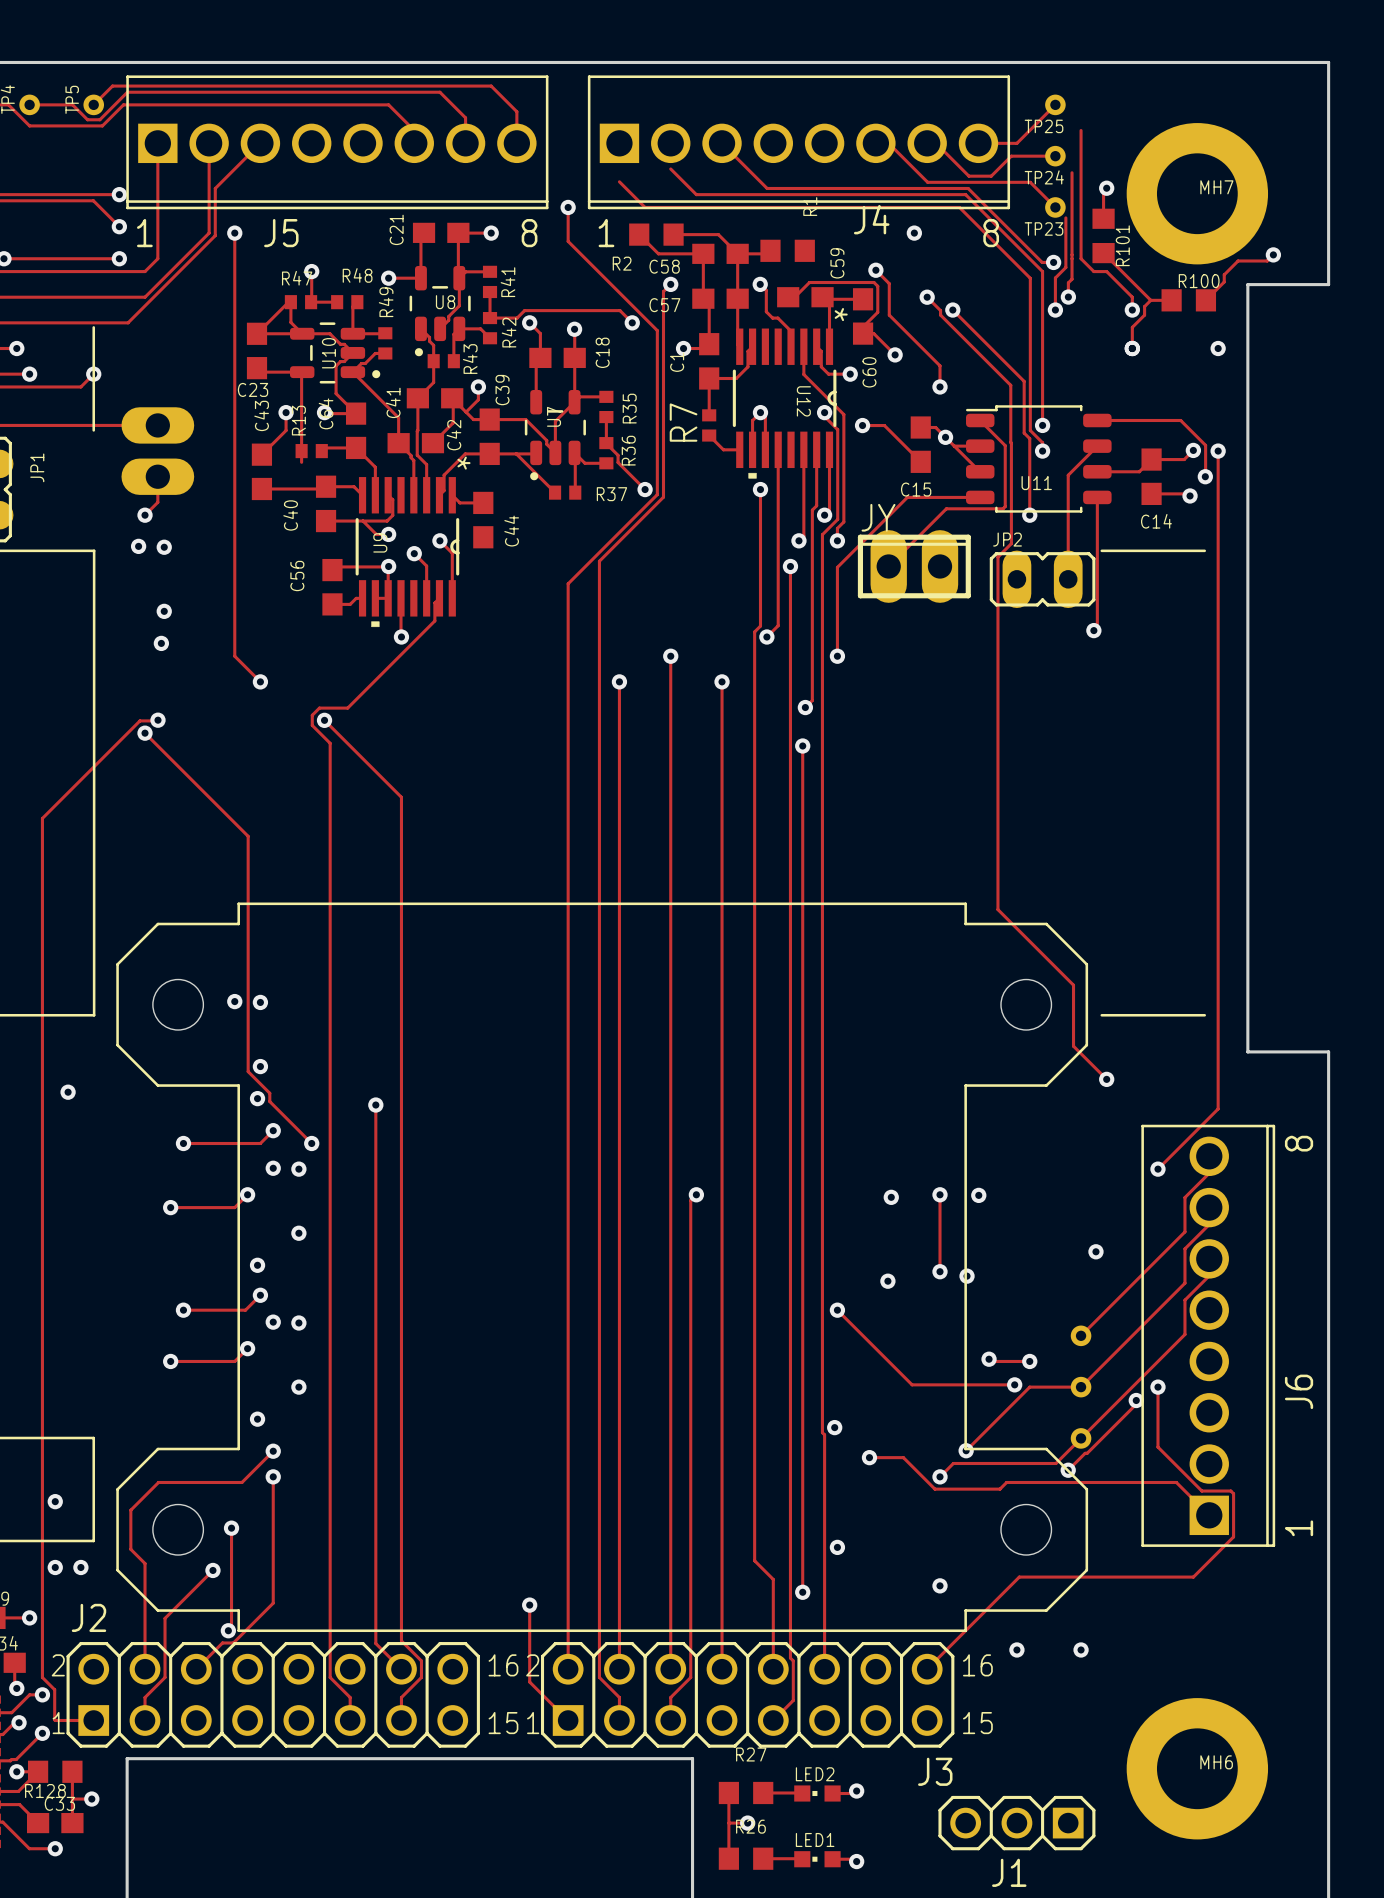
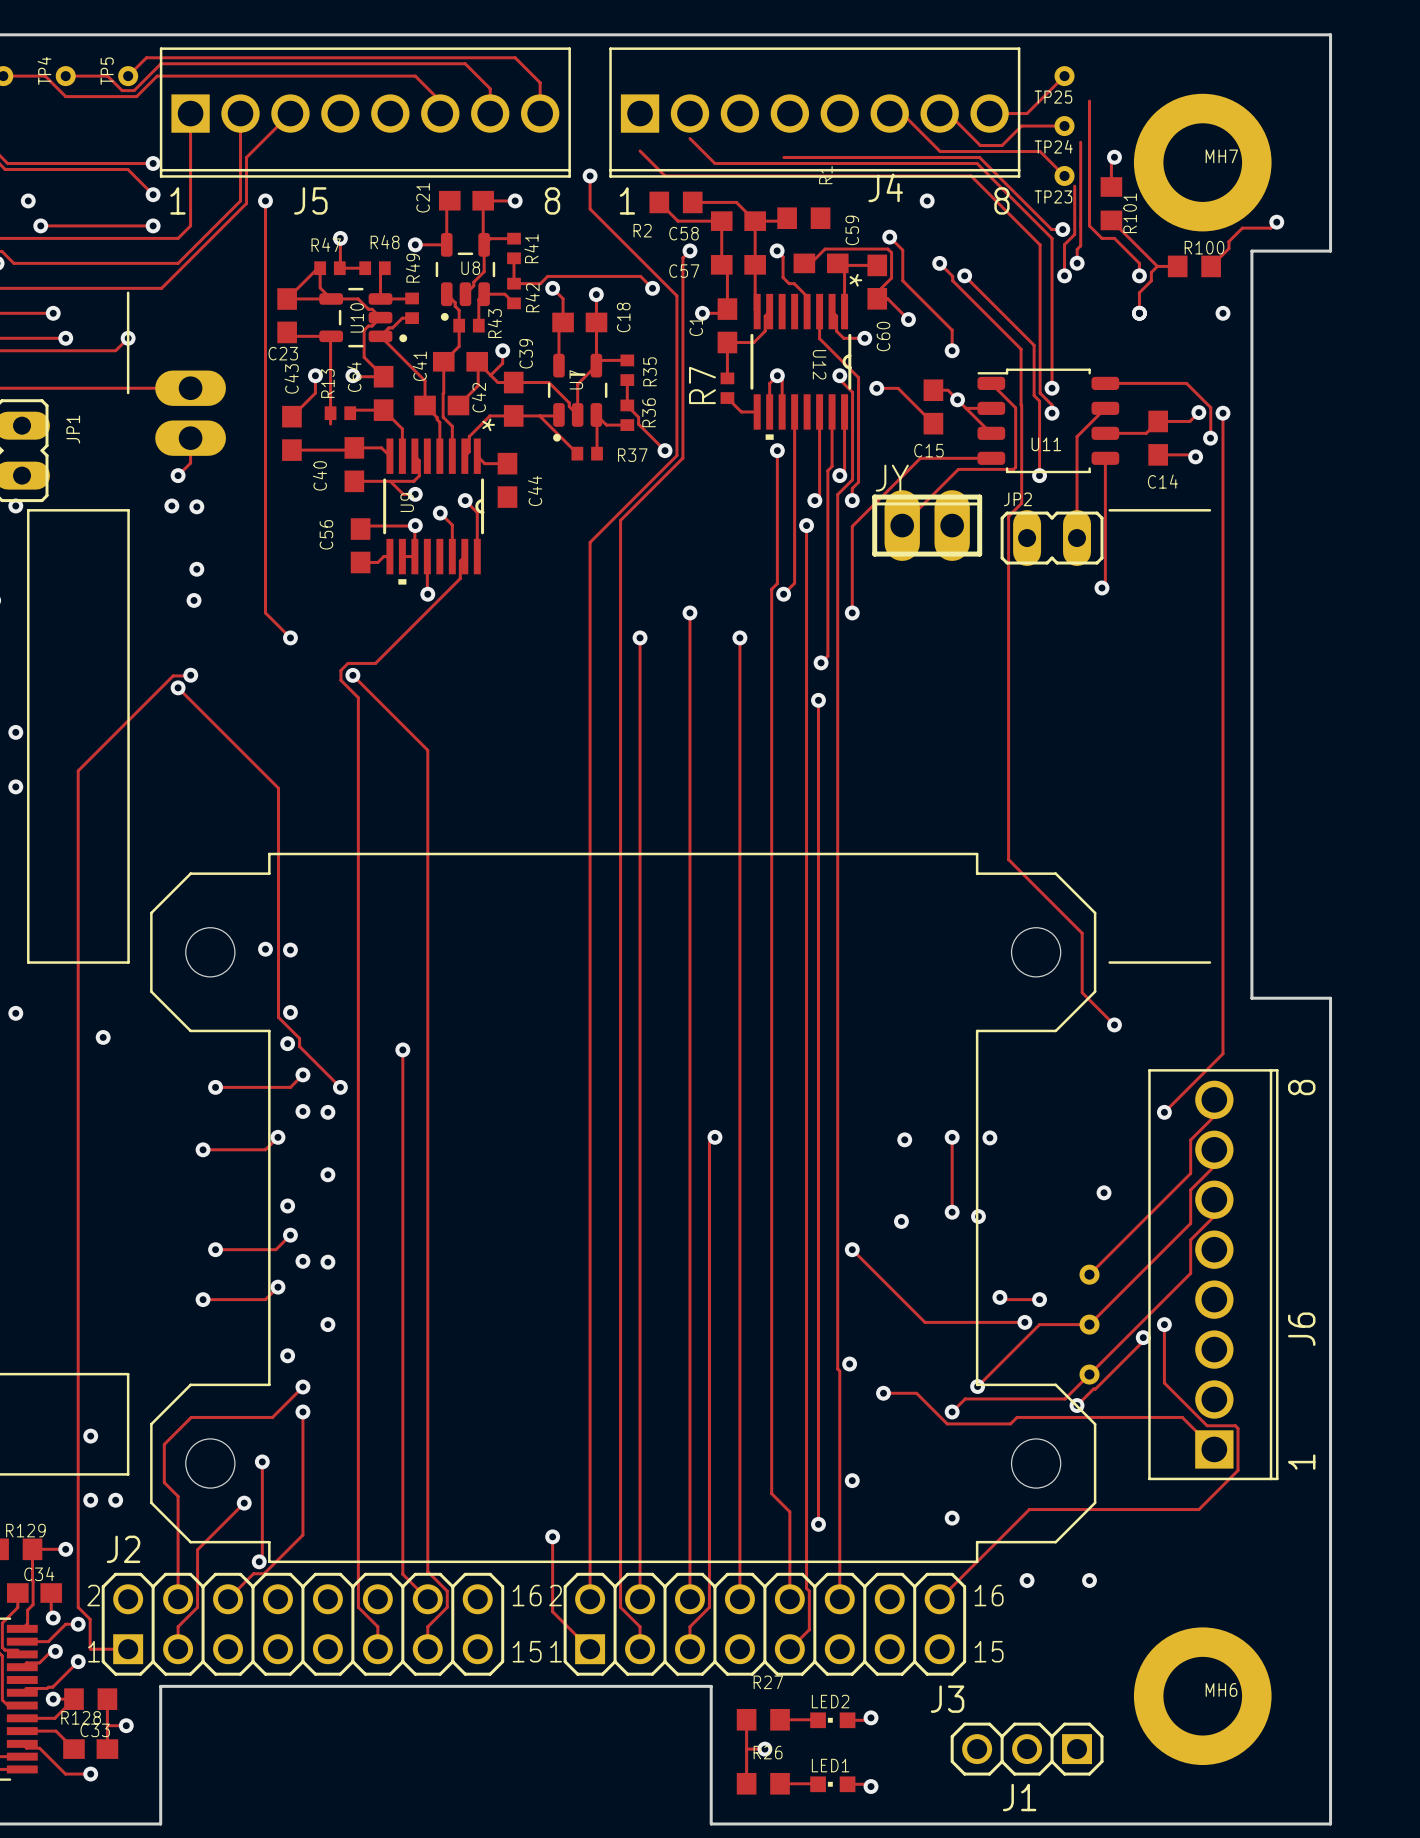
track: (722, 143) (767, 188) -> none

